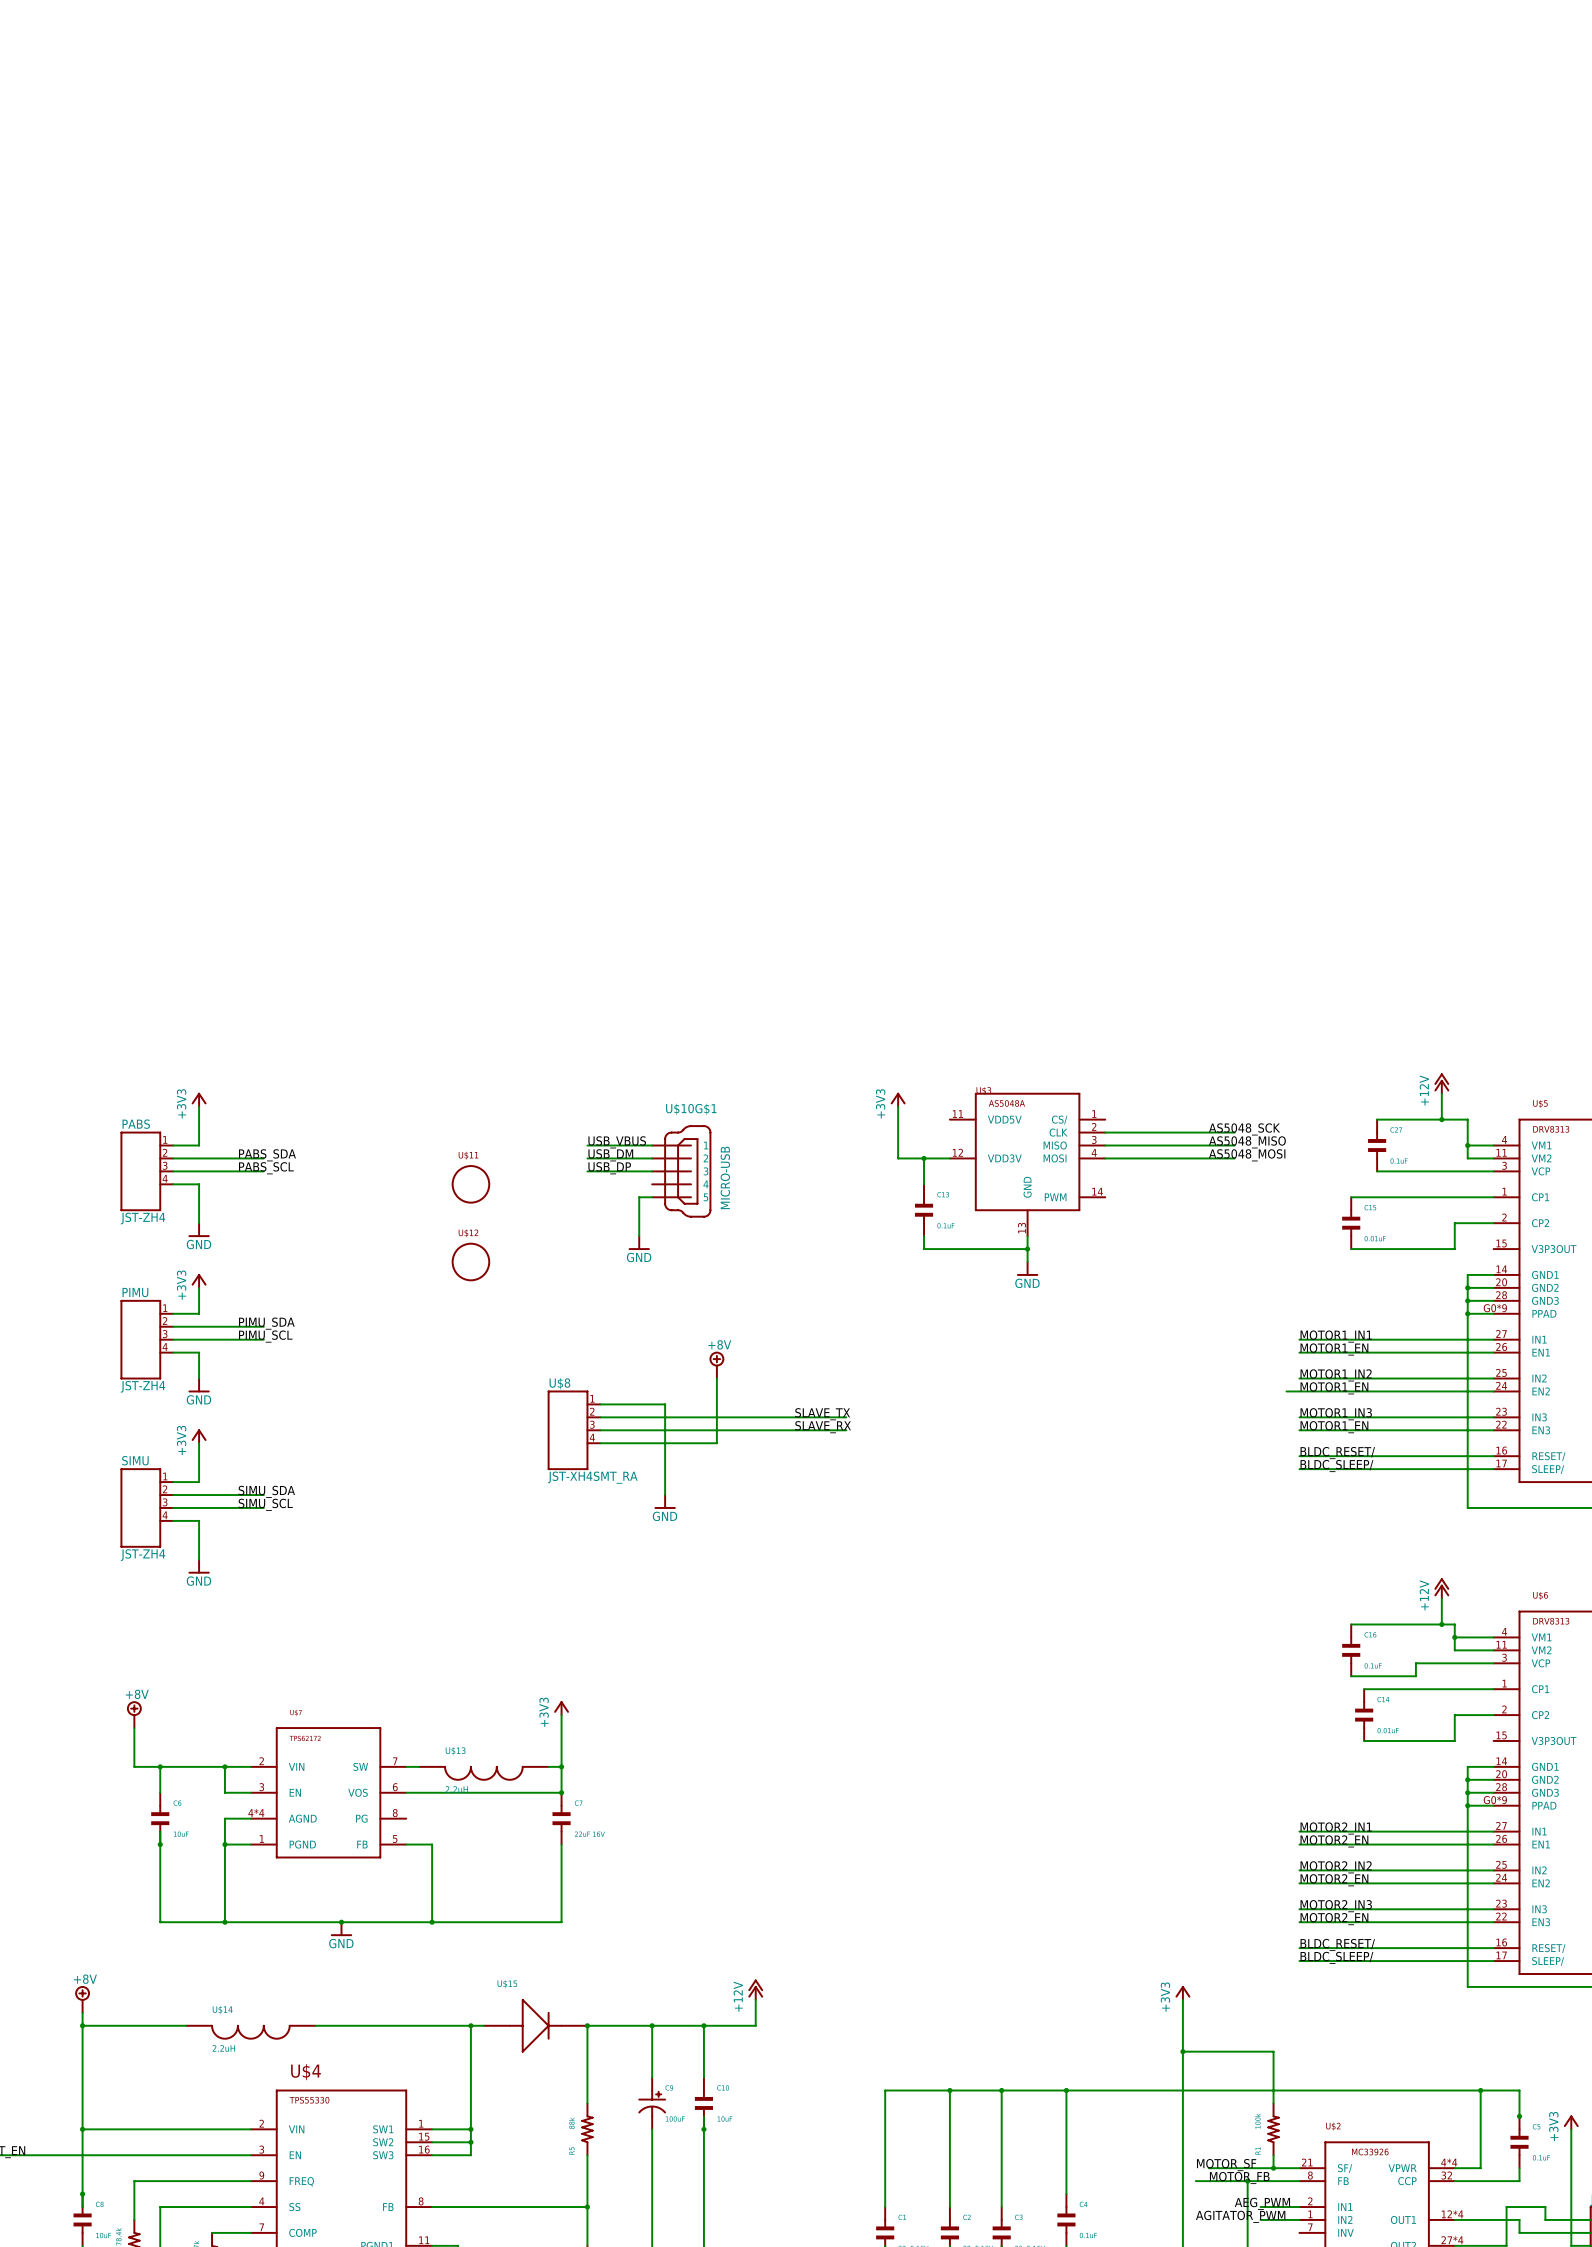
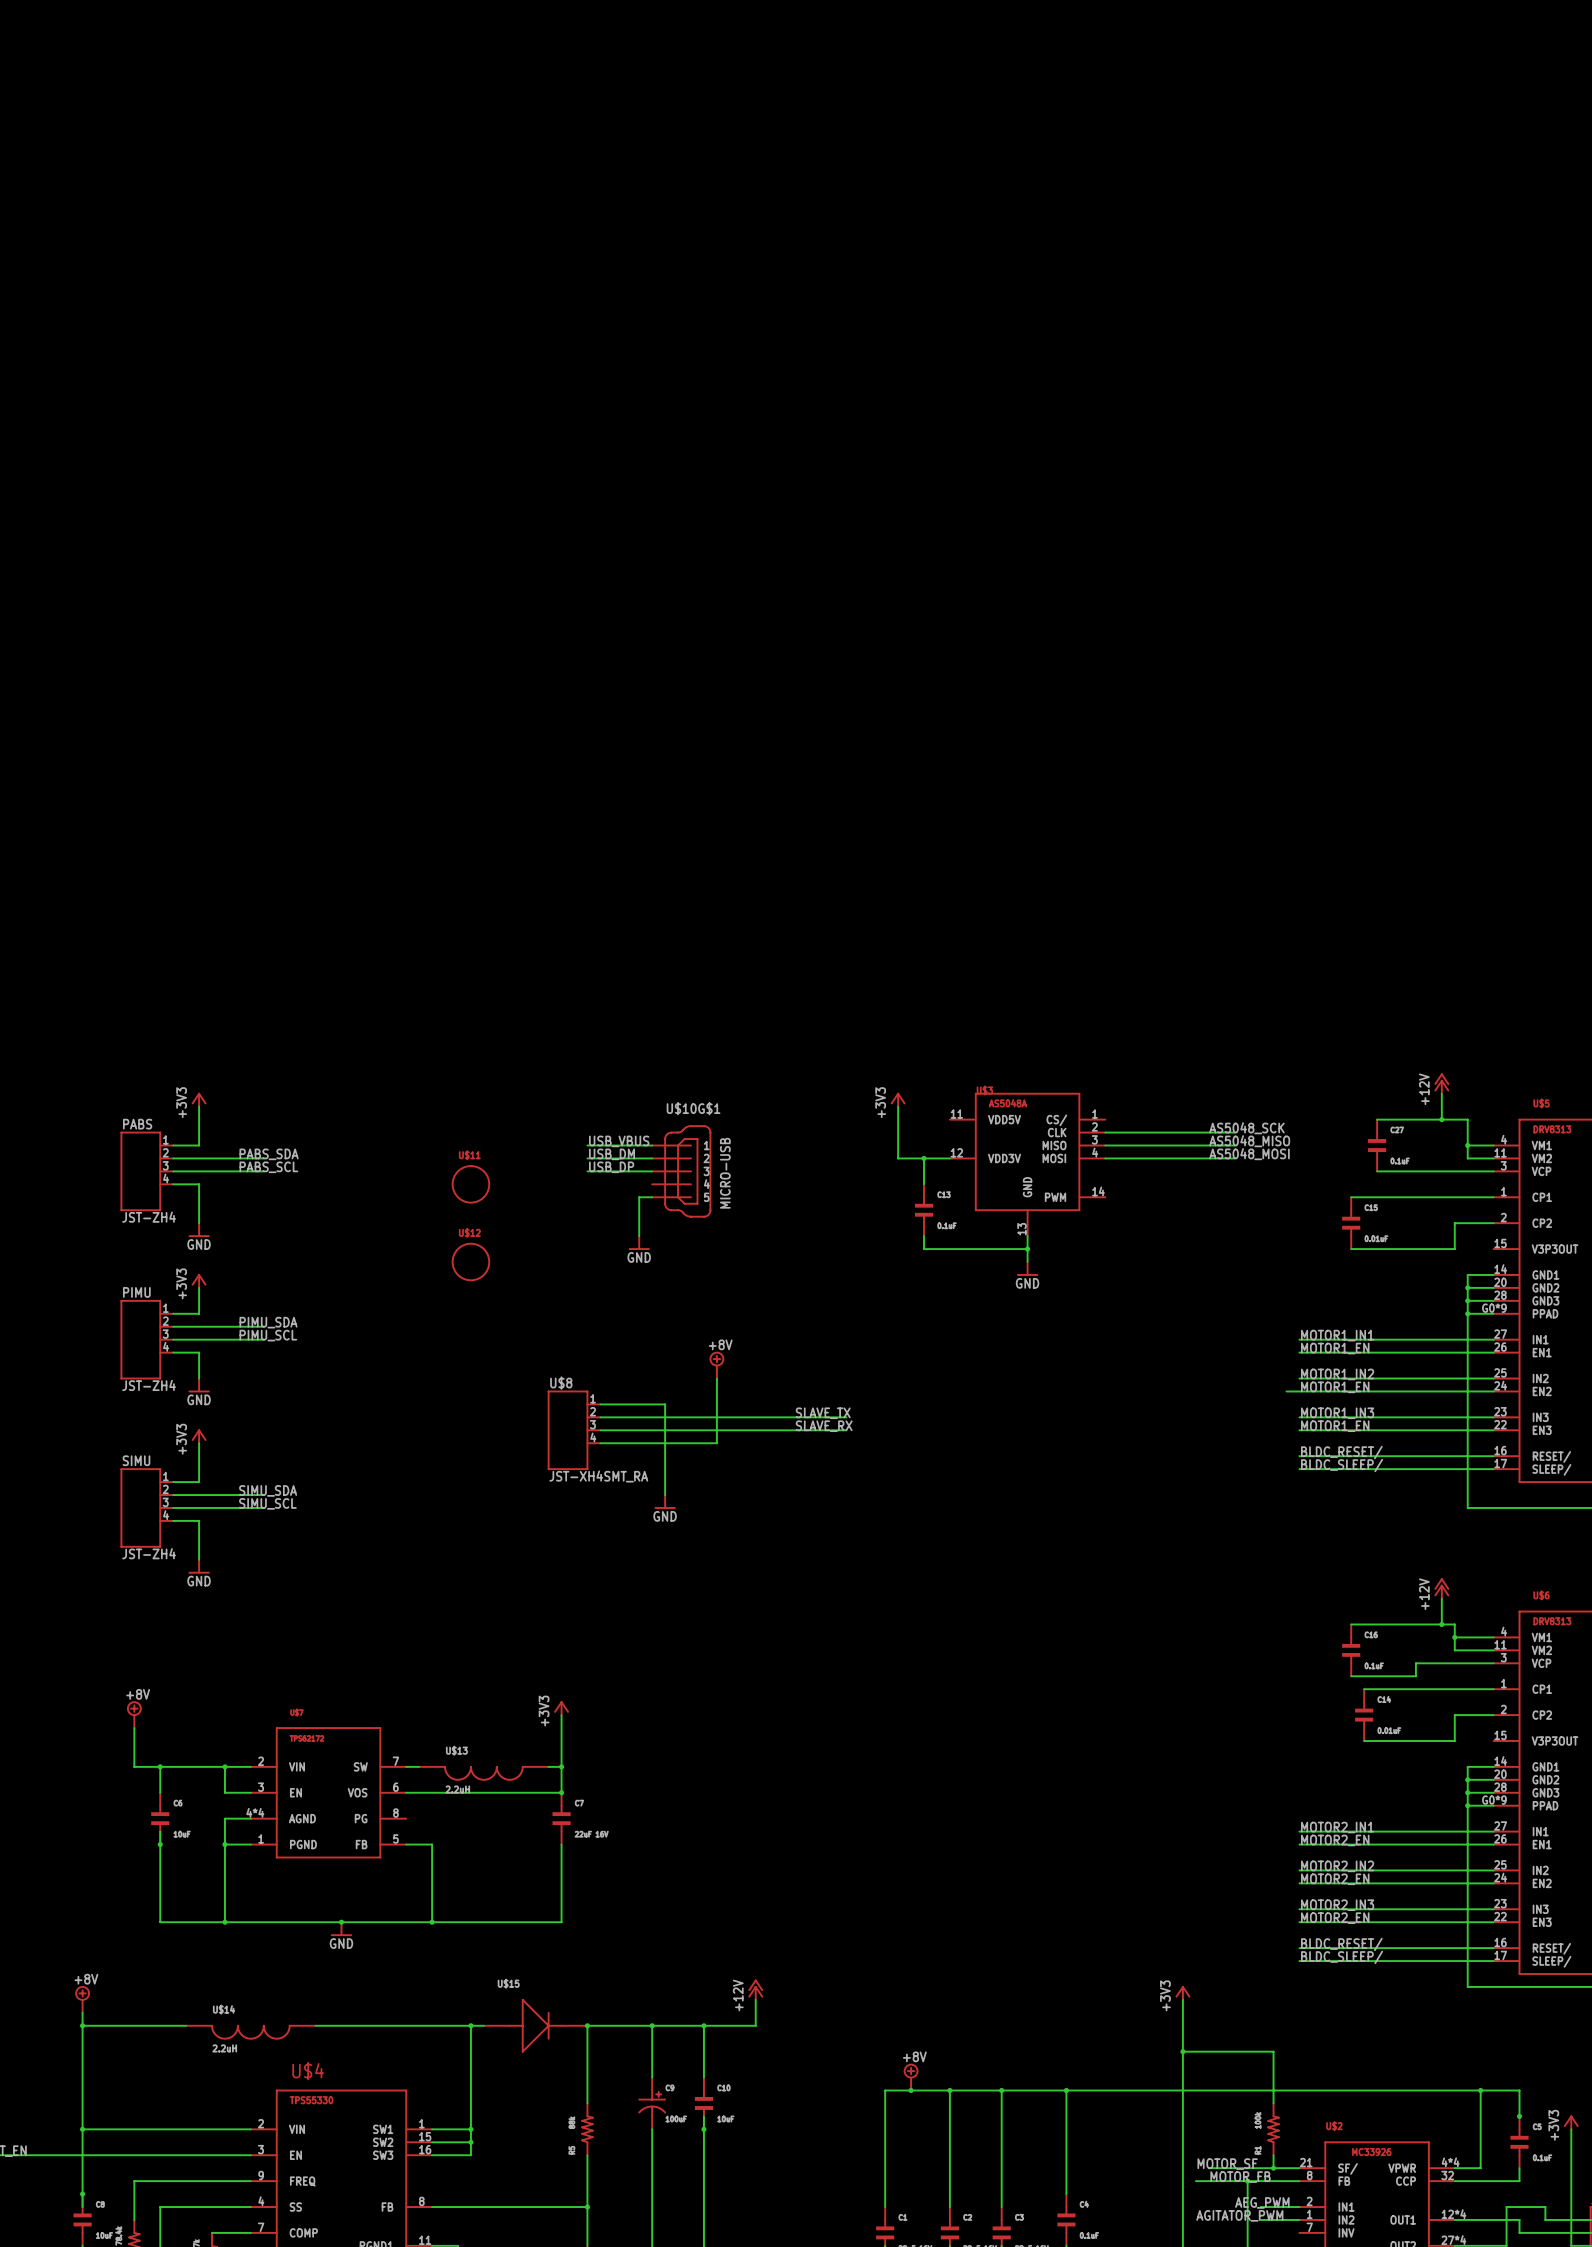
power symbol: none -> +8V (911, 2077)
junction: none -> (911, 2090)

